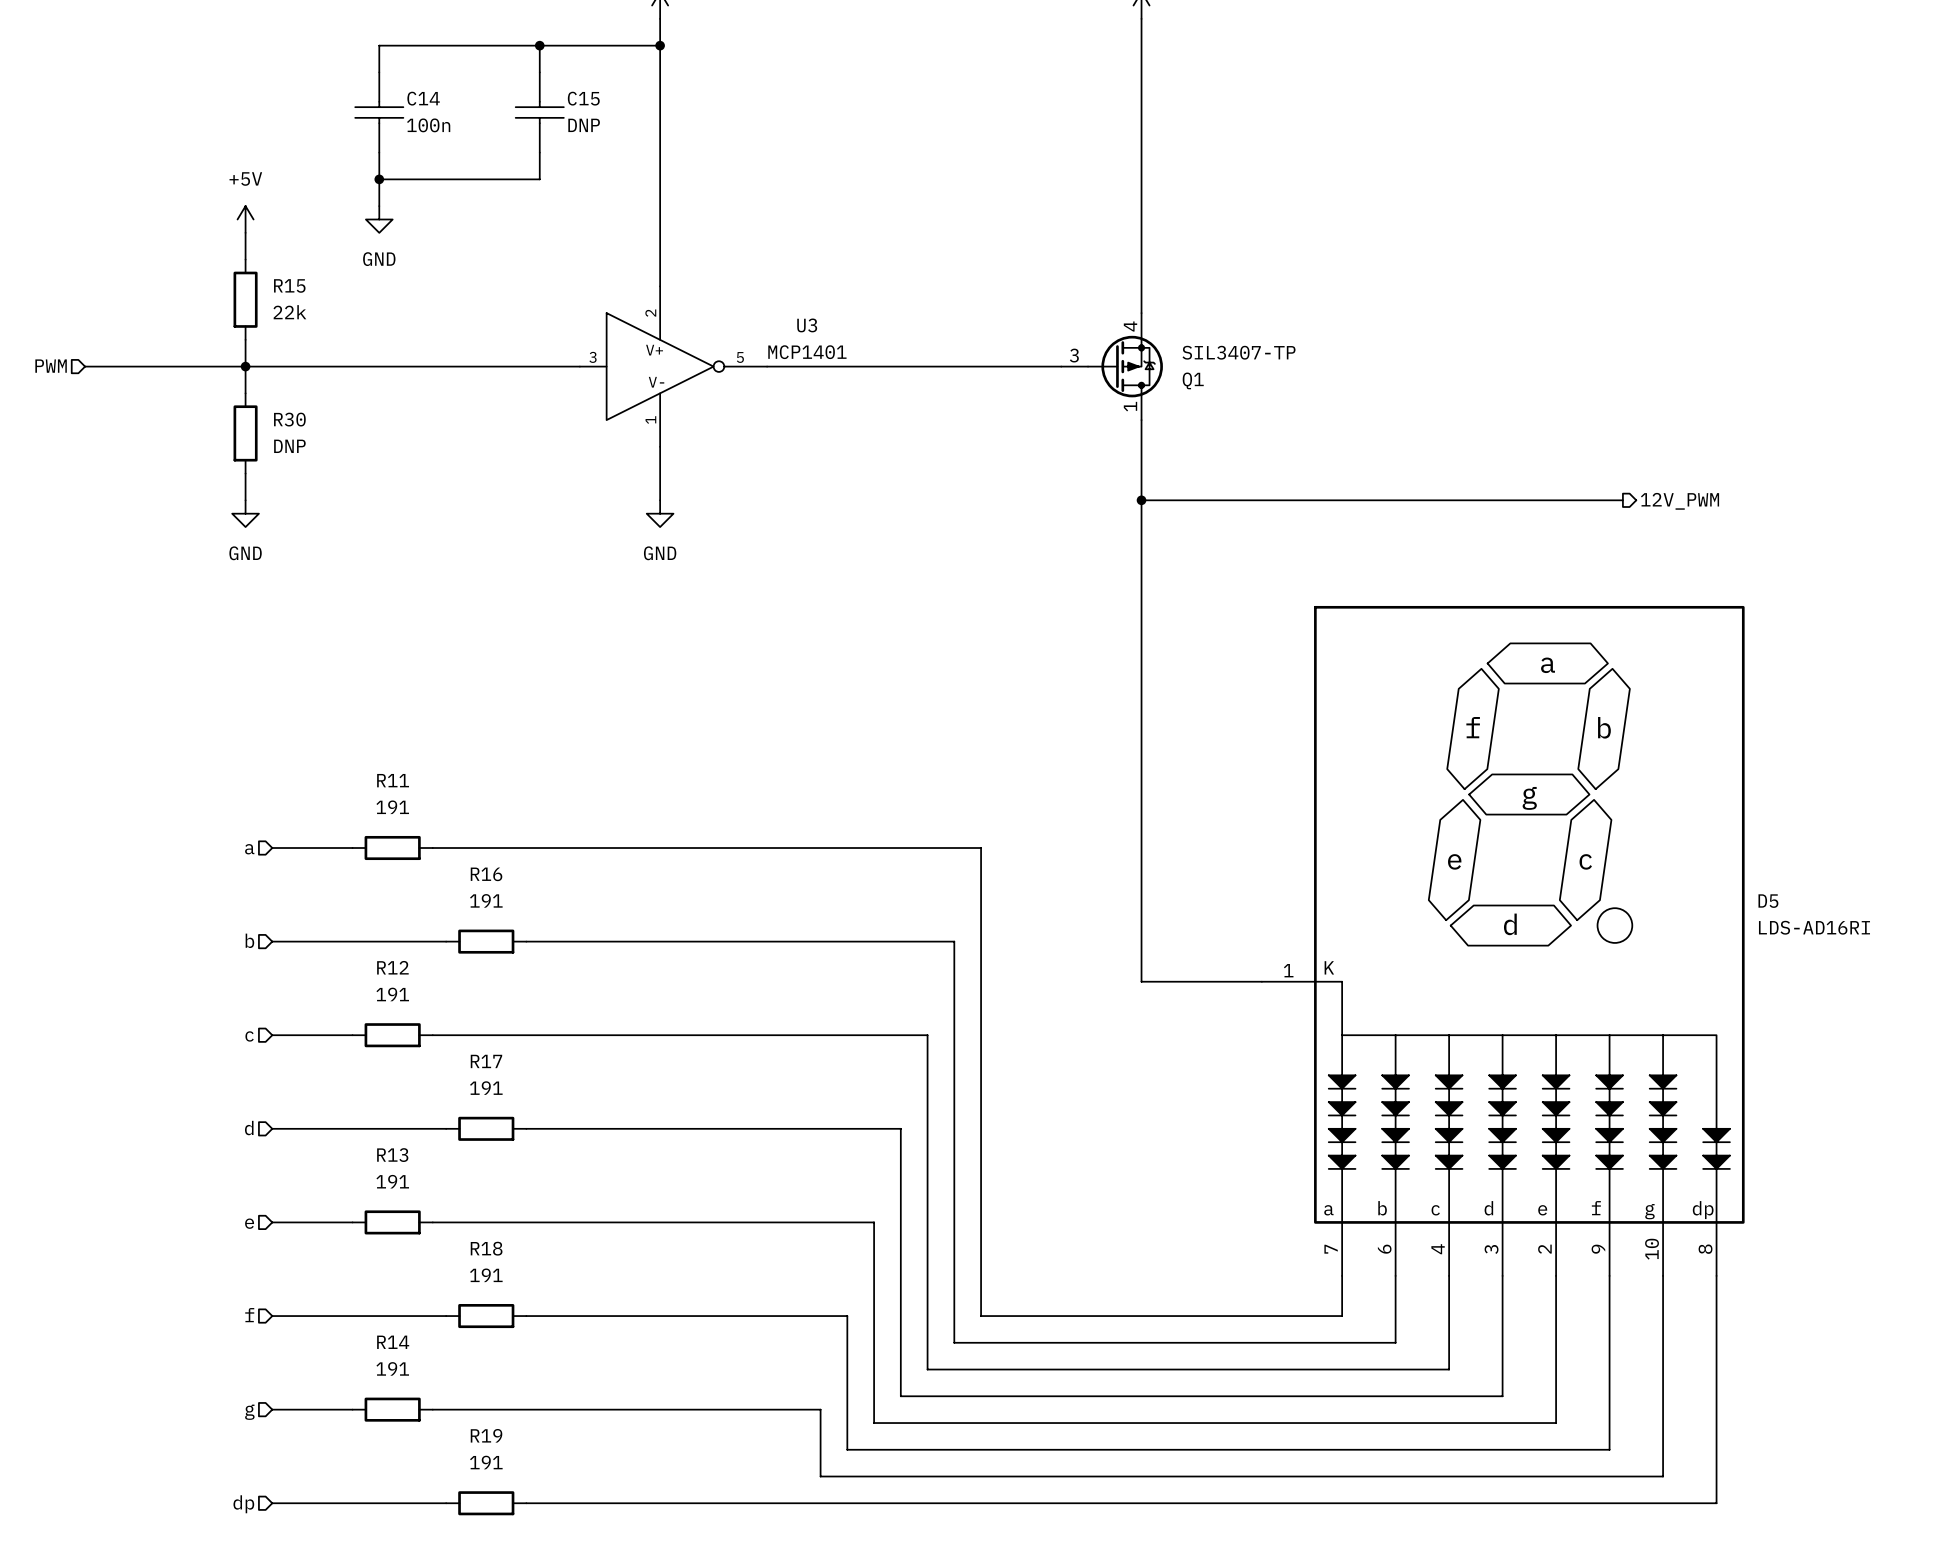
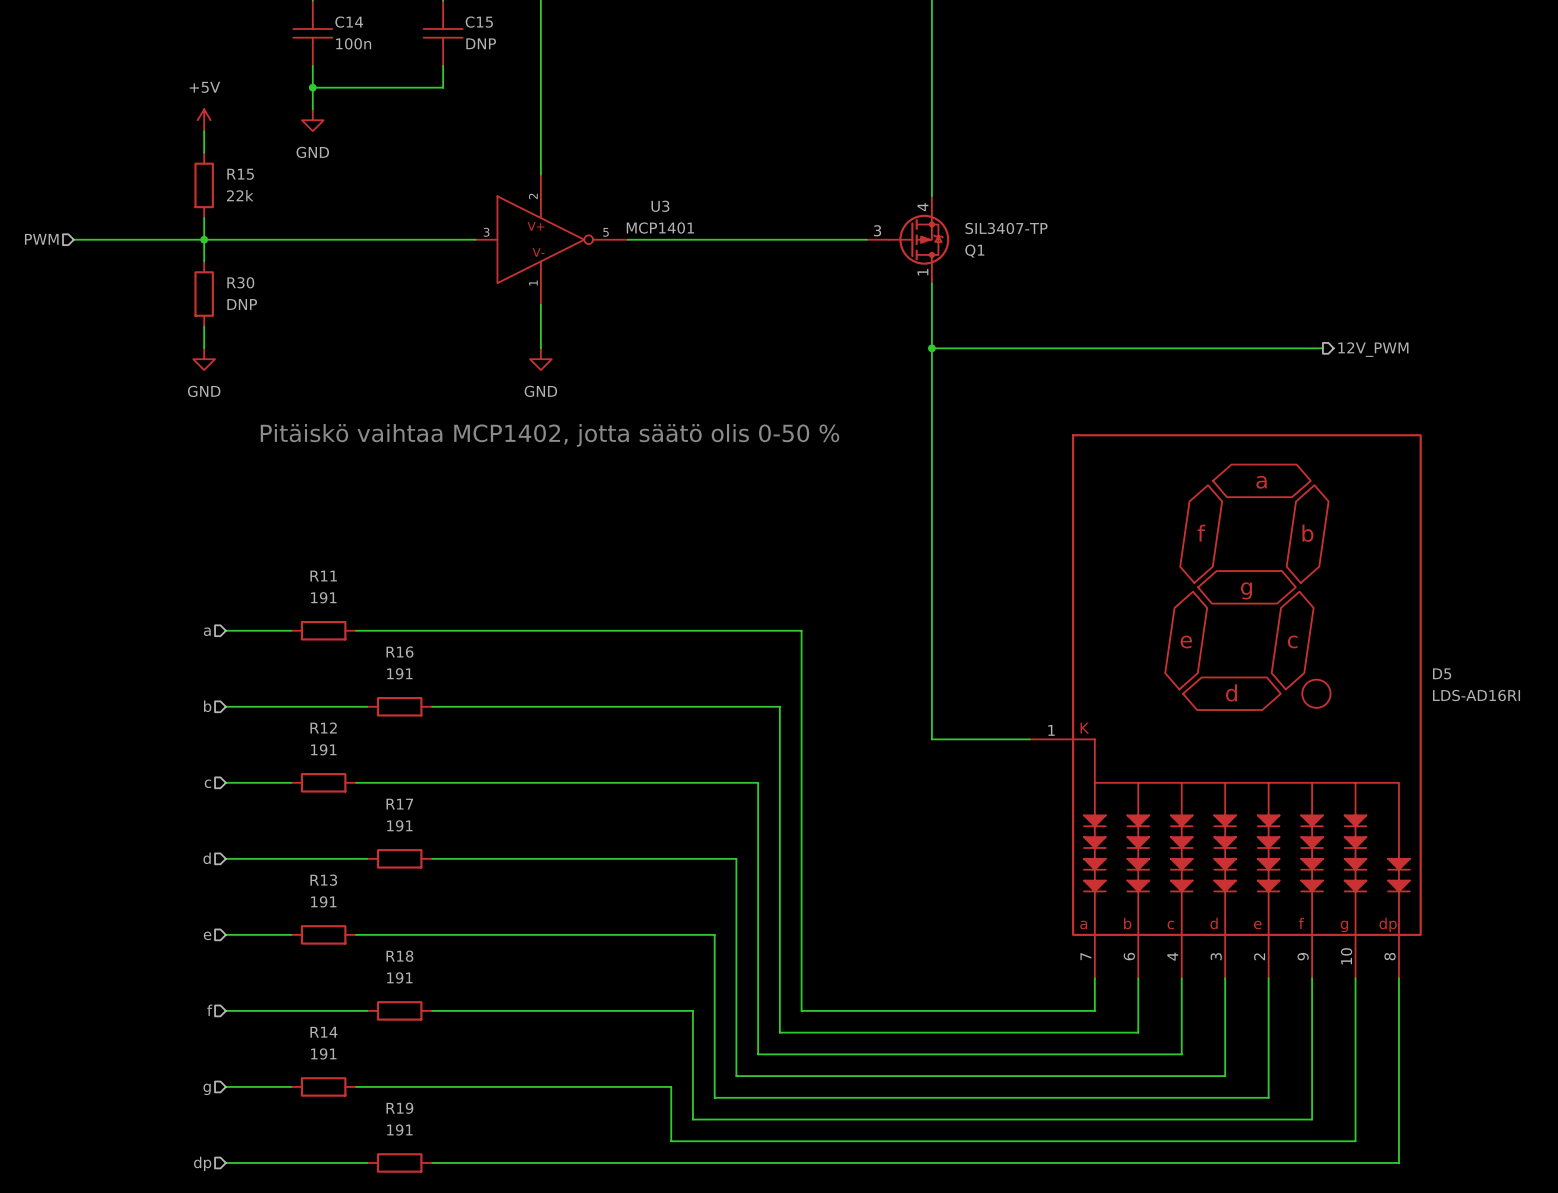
text: none -> Pitäiskö vaihtaa MCP1402, jotta säätö olis 0-50 % (549, 435)

